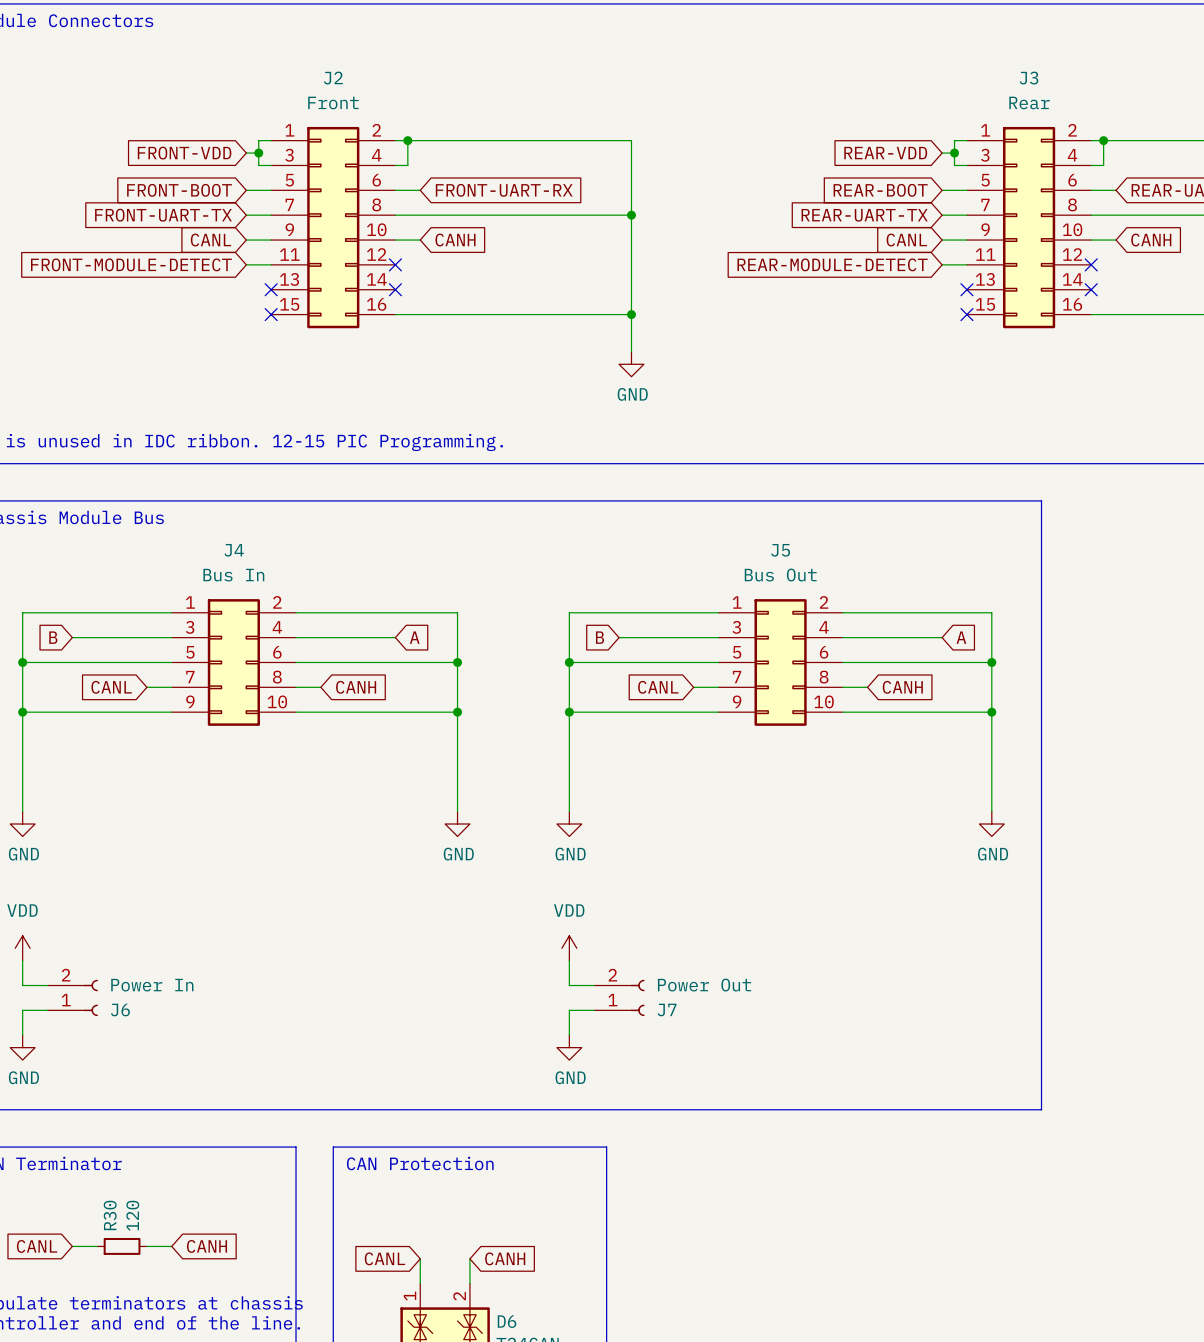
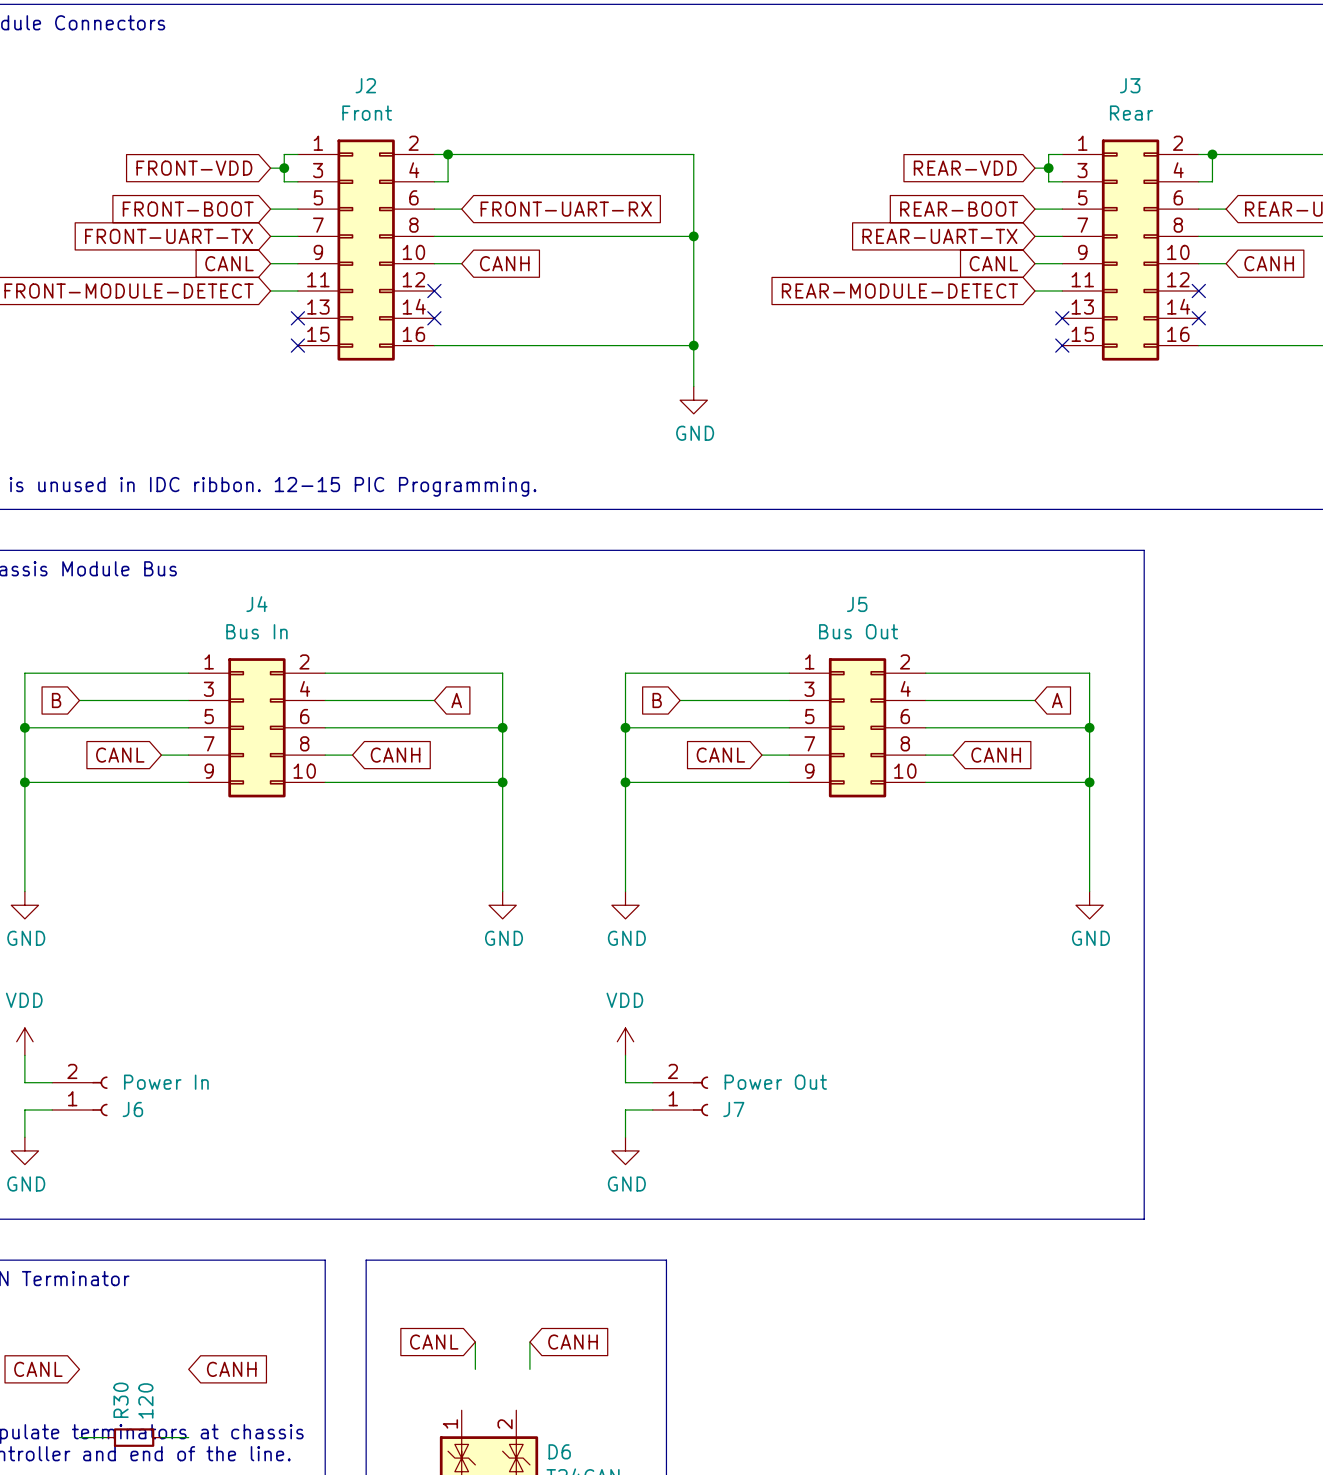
text: CAN Protection (420, 1163) -> none
wire: (72, 1246) (97, 1246) -> (79, 1437) (106, 1437)
R30 position: (122, 1246) -> (134, 1437)
wire: (146, 1246) (171, 1246) -> (161, 1437) (188, 1437)
global label position: CANL (384, 1258) -> CANL (434, 1342)
wire: (420, 1258) (420, 1283) -> (475, 1342) (475, 1369)
wire: (469, 1258) (469, 1283) -> (529, 1342) (529, 1369)
global label position: CANH (505, 1258) -> CANH (573, 1342)

